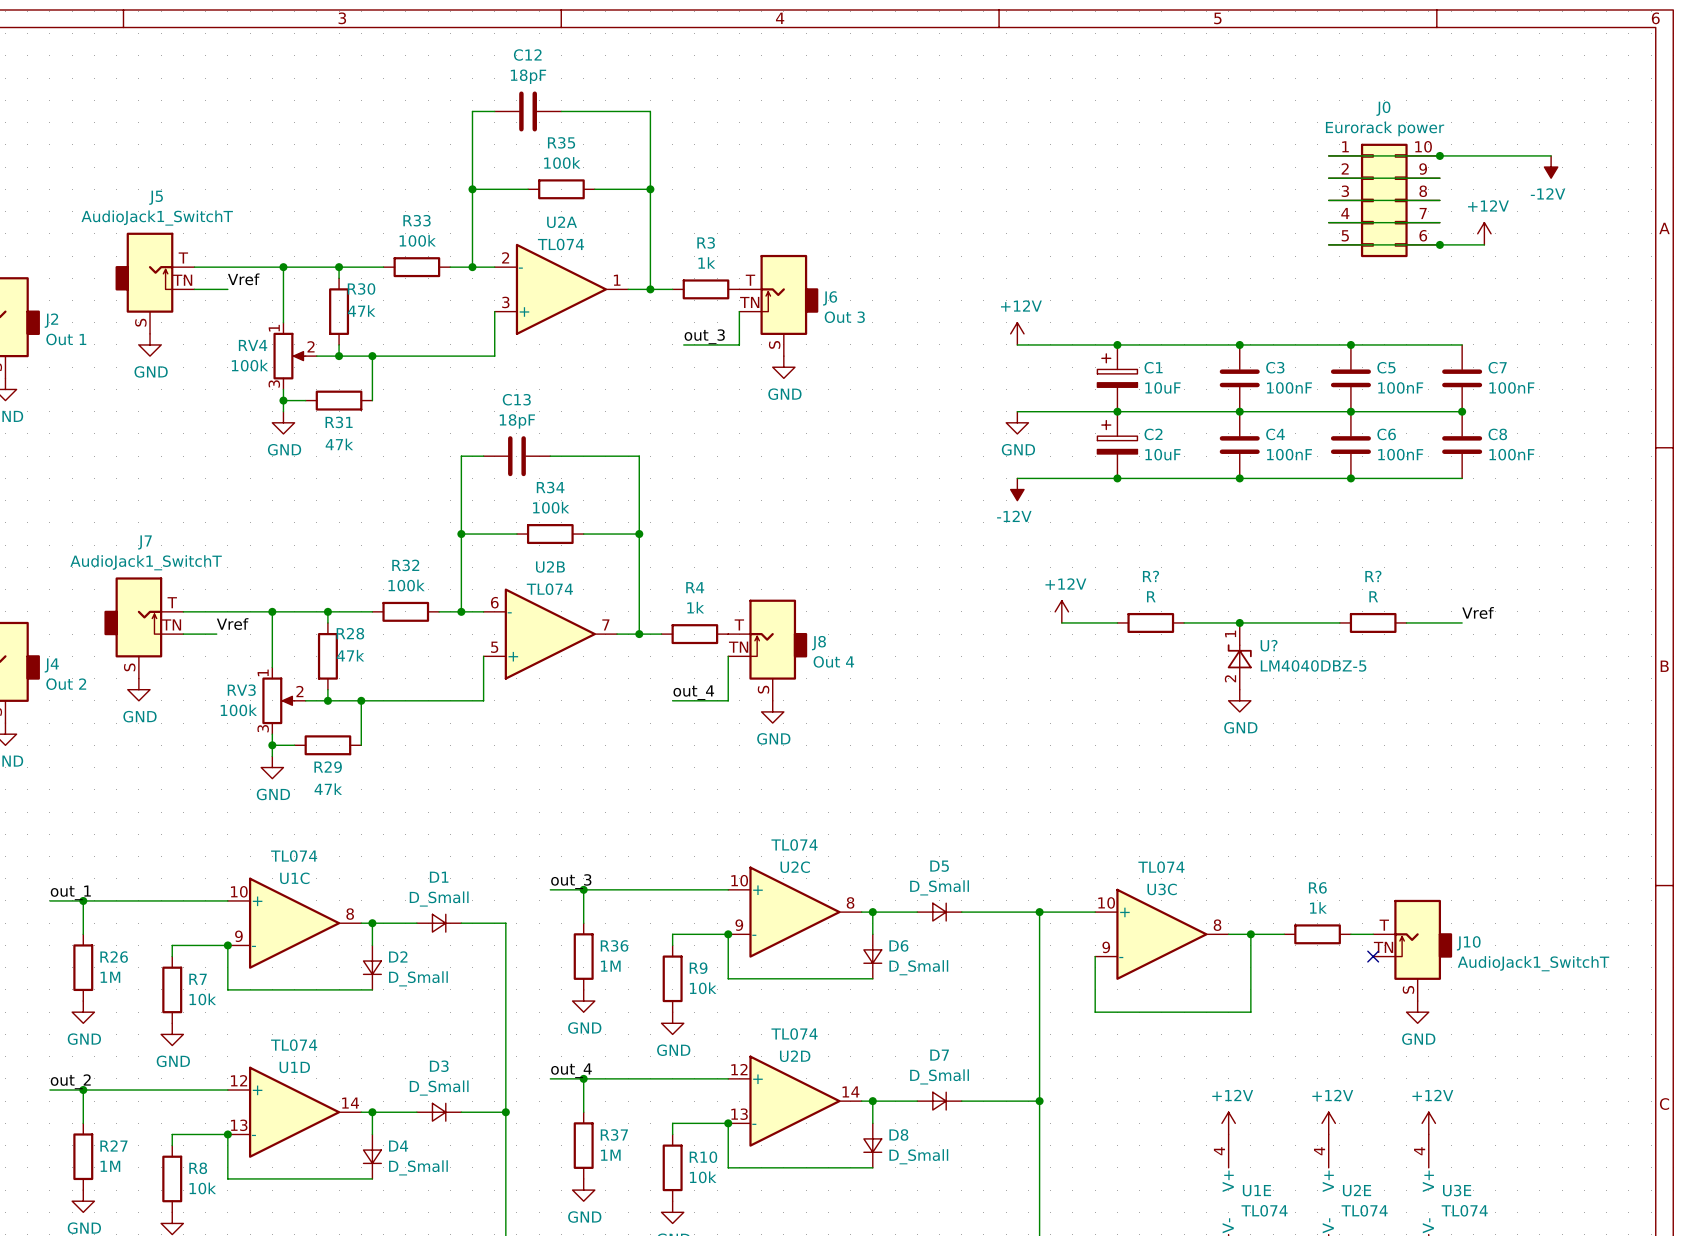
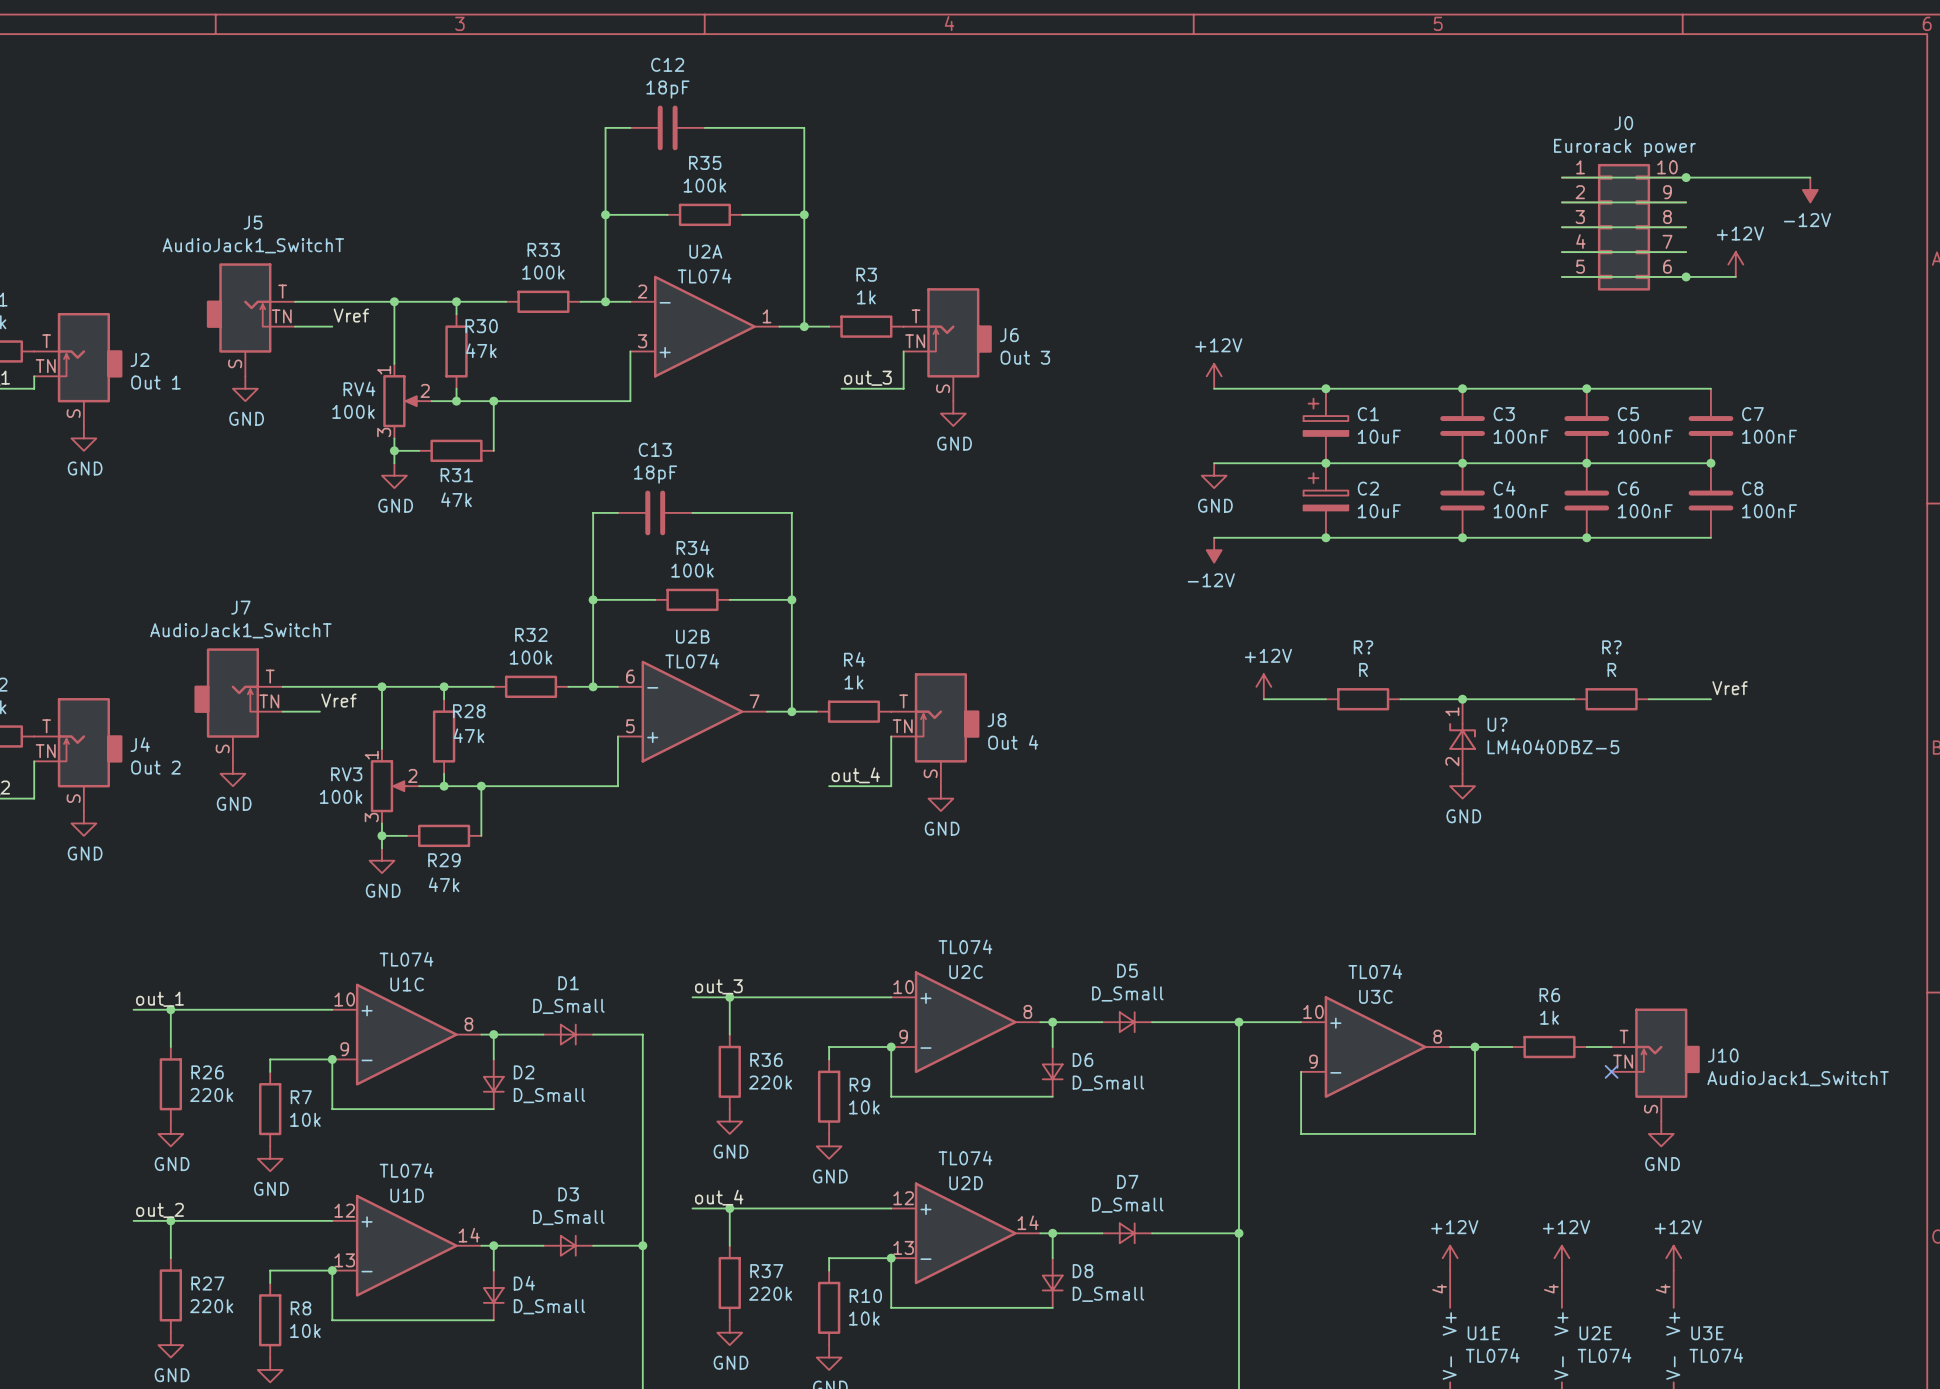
R36 value: 1M (610, 966) -> 220k (770, 1082)
R26 value: 1M (110, 977) -> 220k (211, 1094)
R37 value: 1M (610, 1155) -> 220k (770, 1293)
R27 value: 1M (110, 1166) -> 220k (211, 1306)

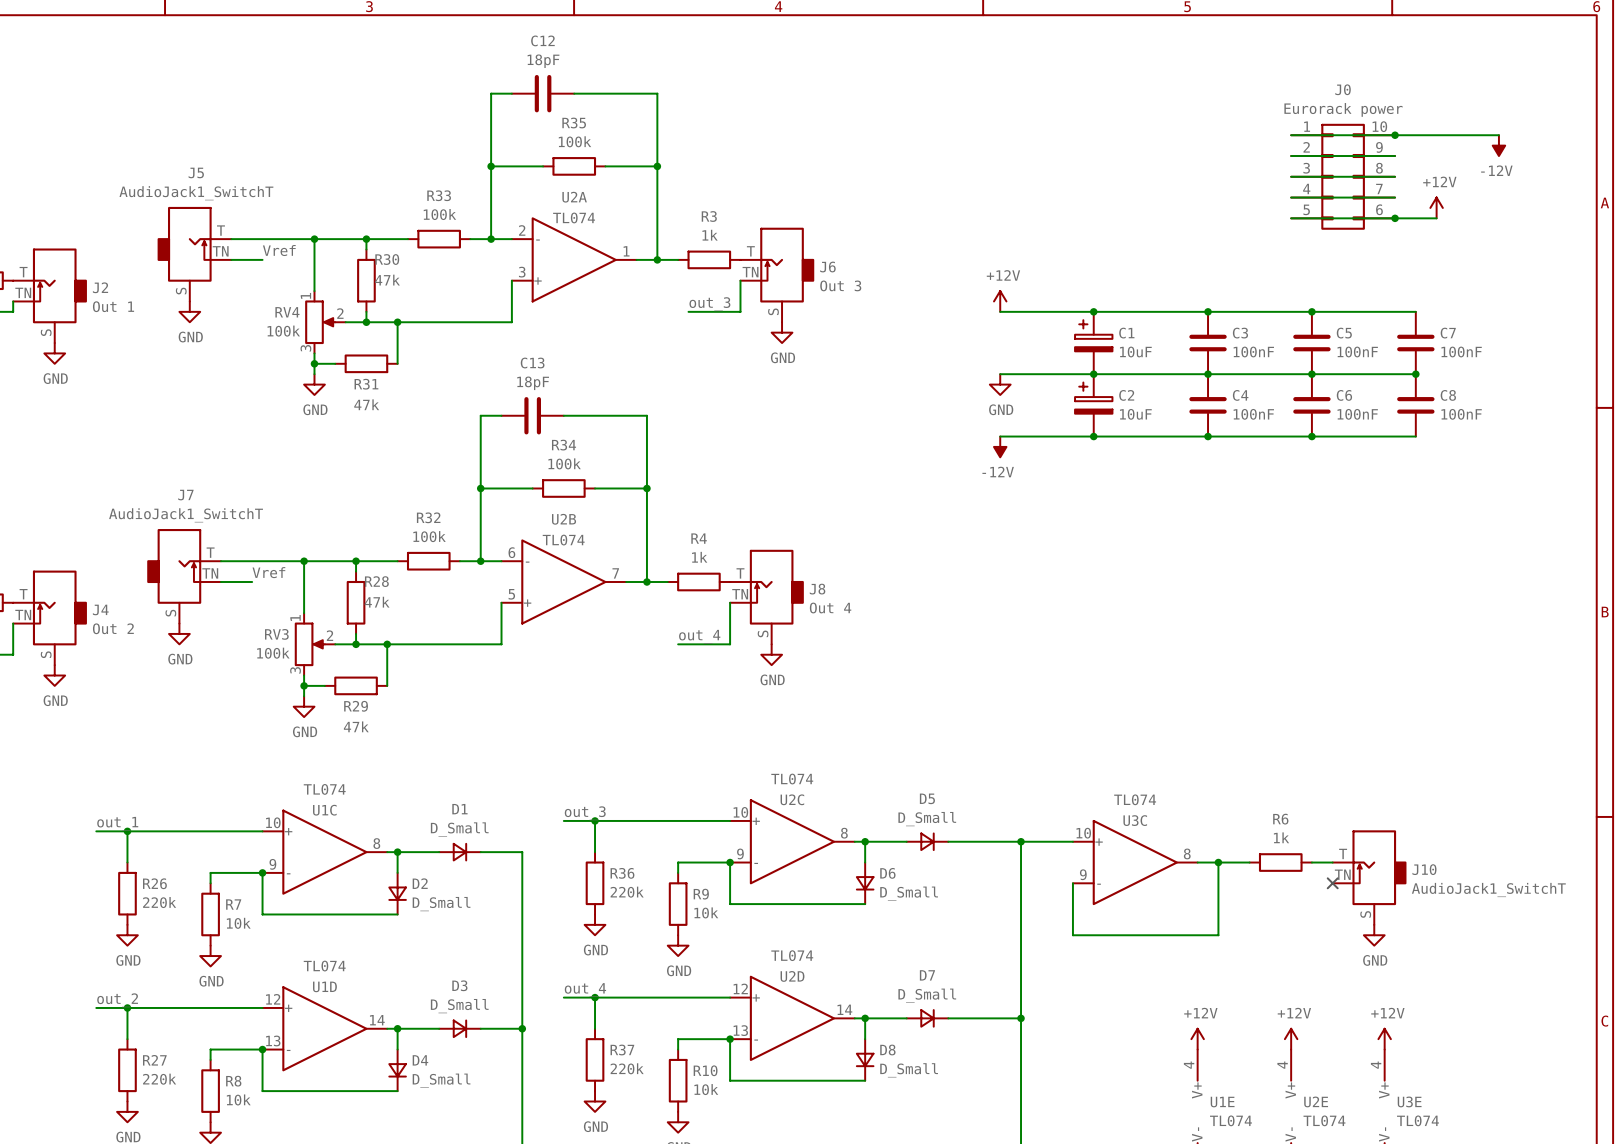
power symbol: +12V (1263, 686) -> none
label: Vref (1729, 688) -> none
wire: (1263, 699) (1325, 699) -> none
R?: R (1363, 699) -> none
wire: (1400, 699) (1574, 699) -> none
junction: (1462, 699) -> none
R?: R (1611, 699) -> none
wire: (1648, 699) (1710, 699) -> none
U?: LM4040DBZ-5 (1462, 736) -> none
power symbol: GND (1462, 786) -> none

